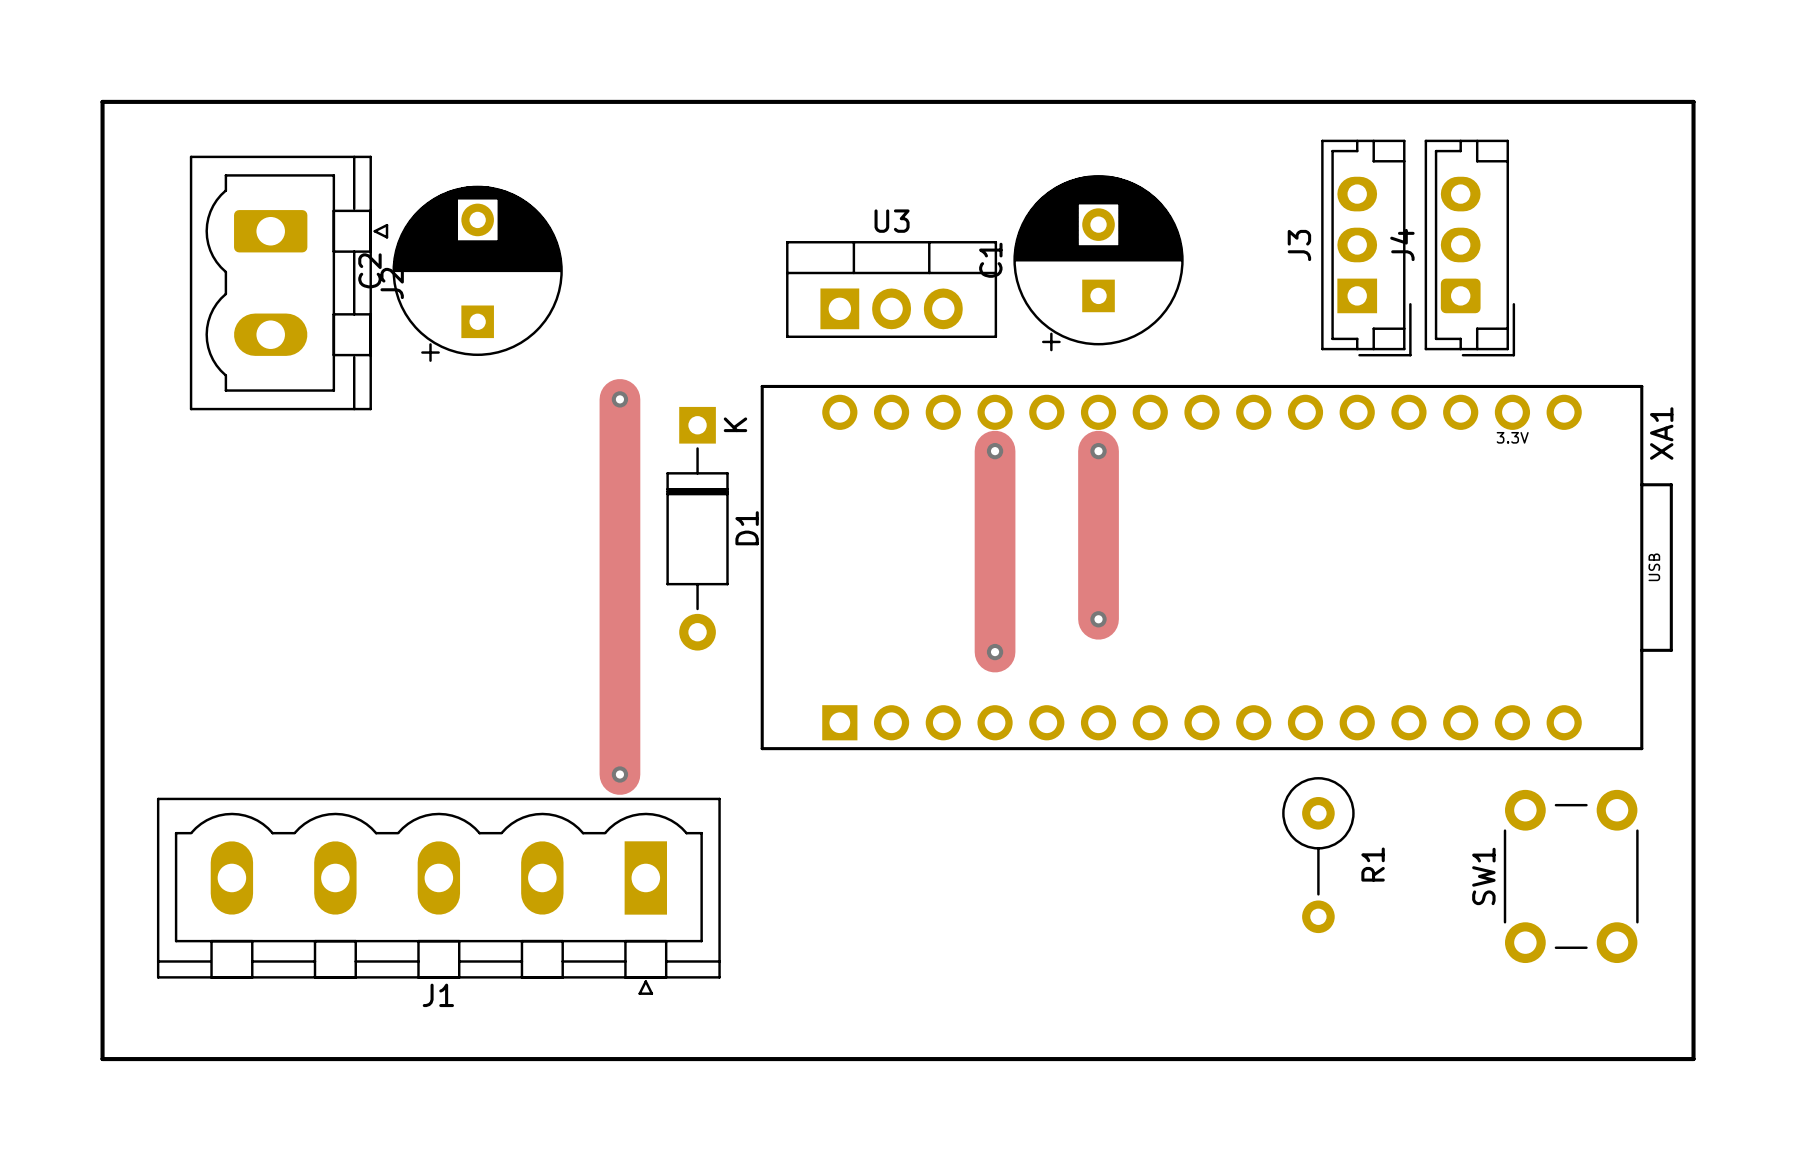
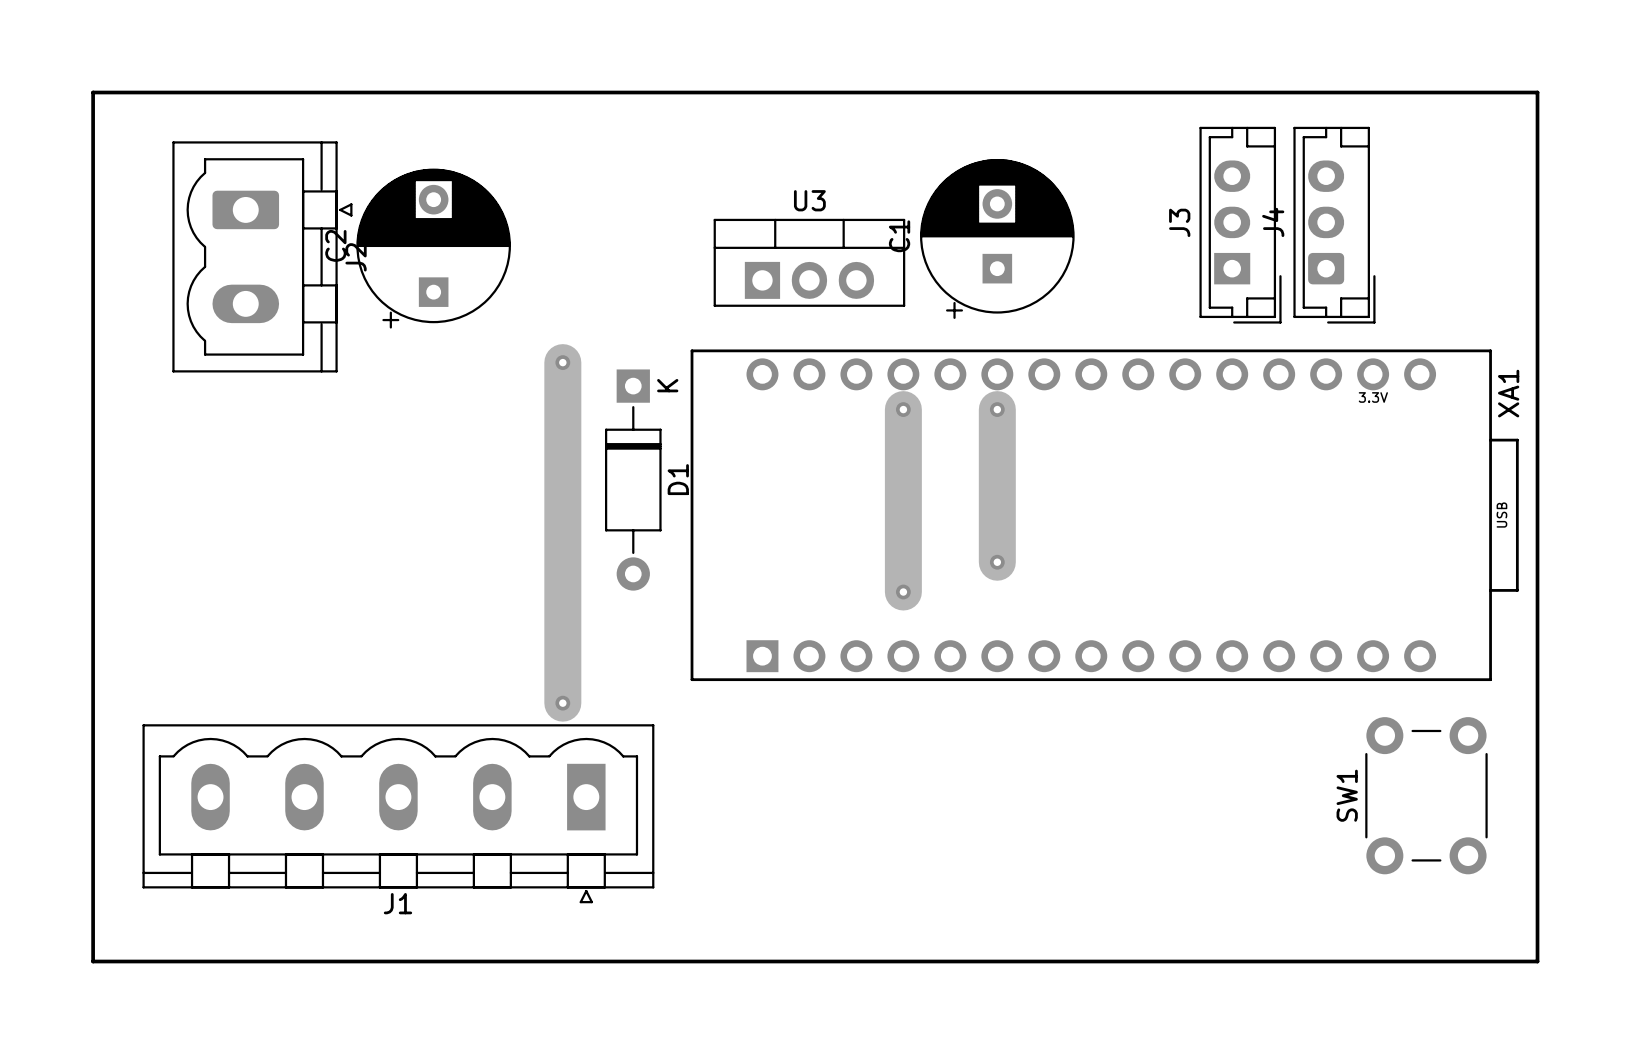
R1: (1318, 855) -> none

